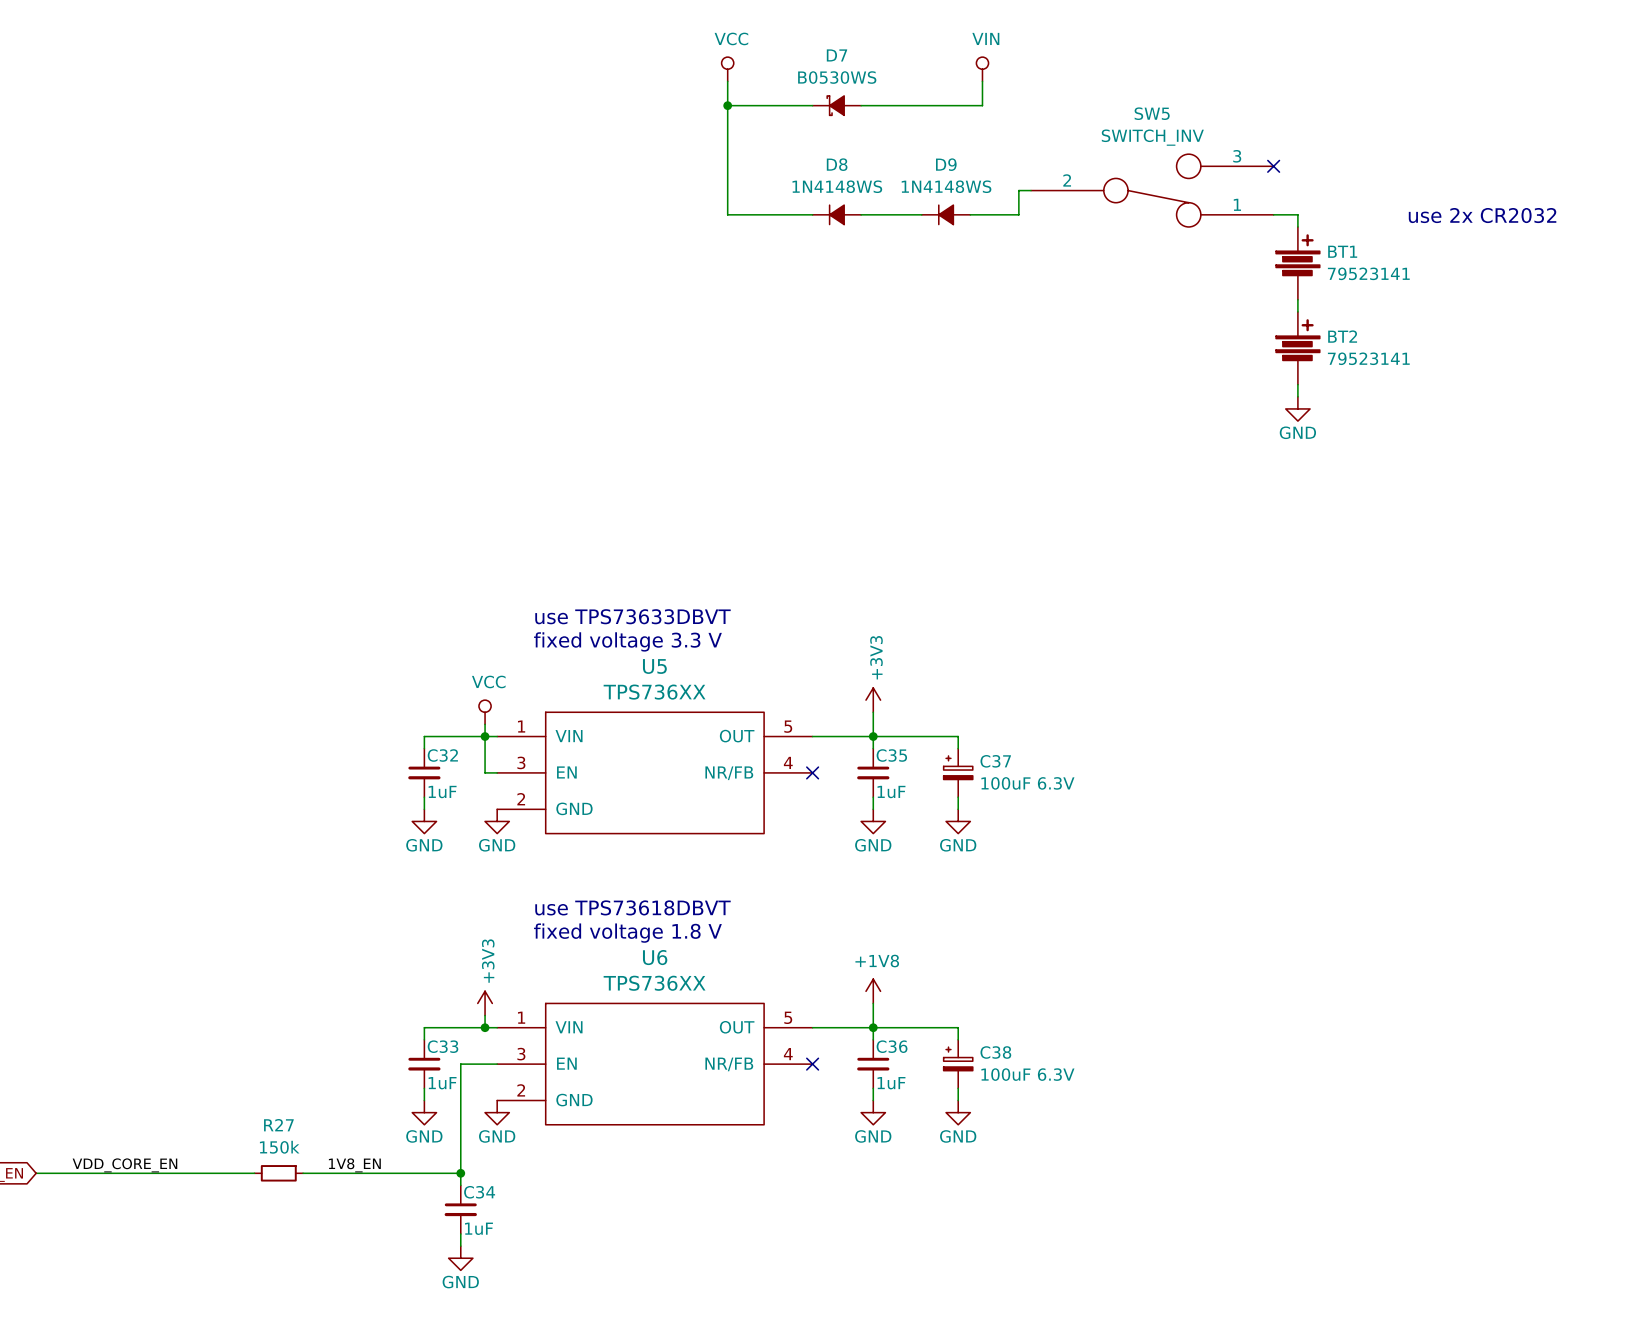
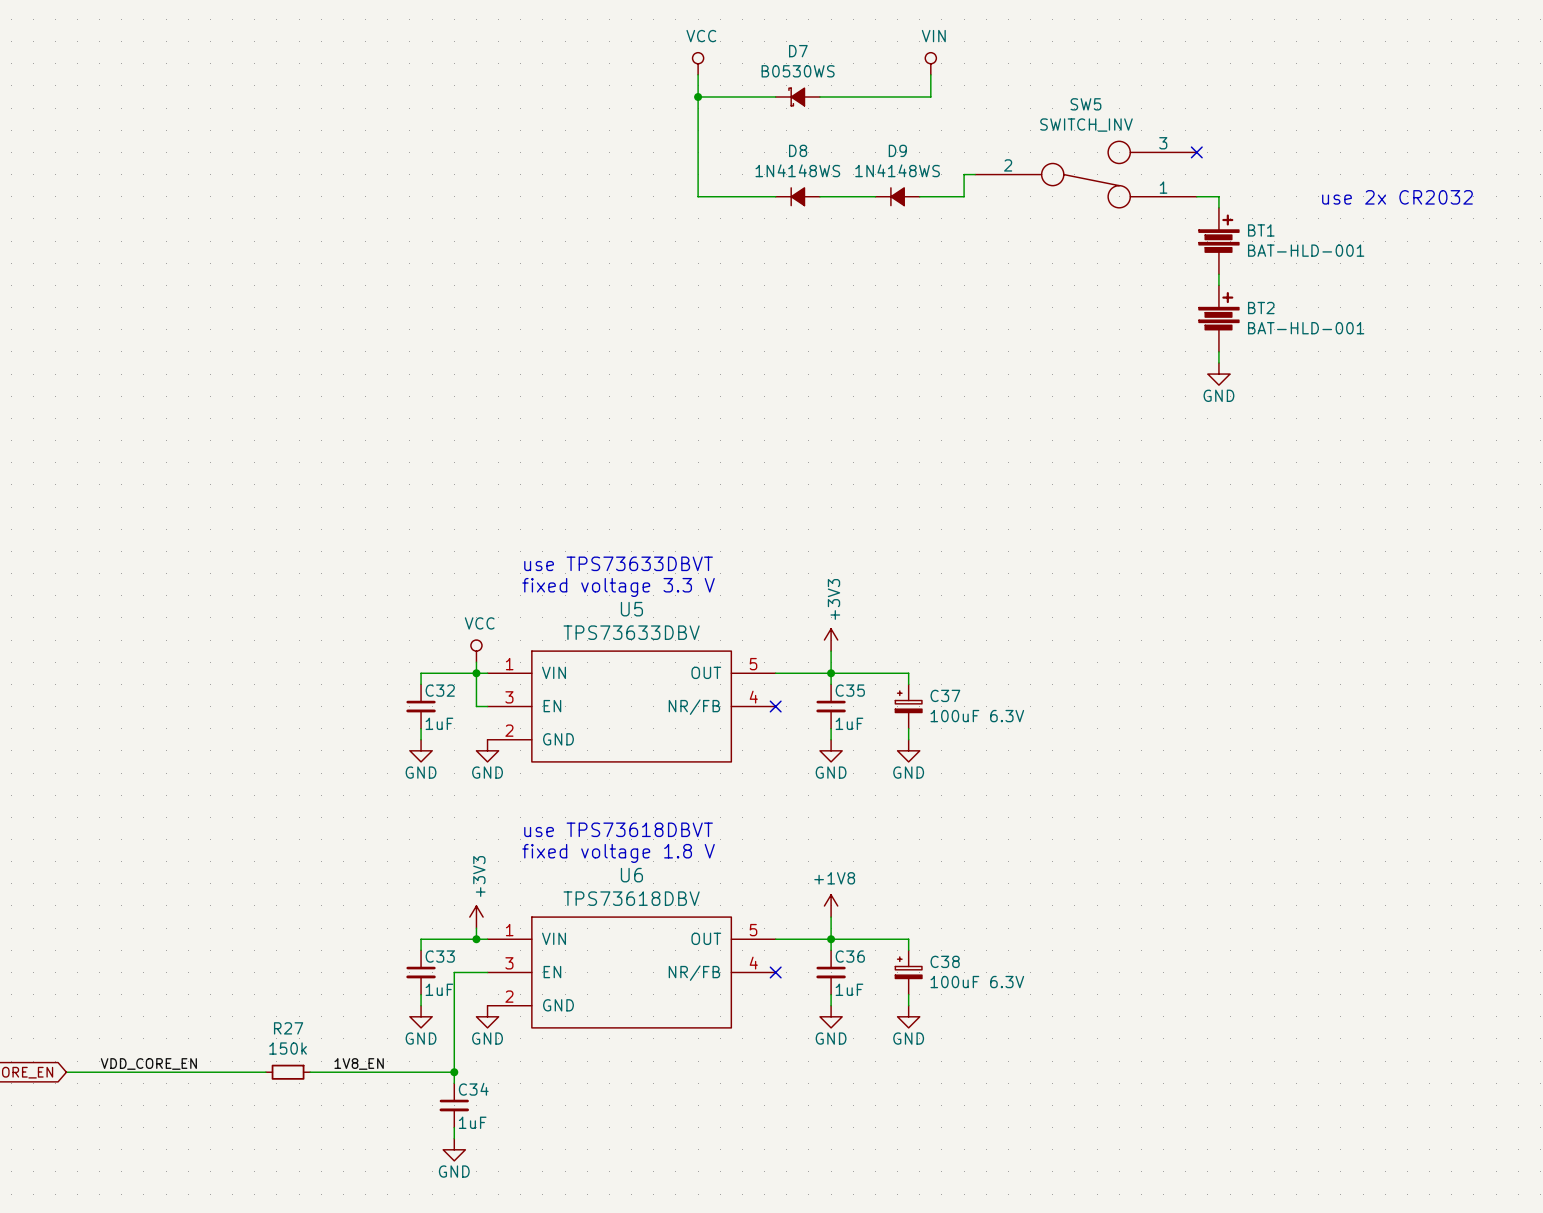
BT1 value: 79523141 (1368, 273) -> BAT-HLD-001 (1306, 250)
BT2 value: 79523141 (1368, 358) -> BAT-HLD-001 (1306, 328)
U5 value: TPS736XX (654, 692) -> TPS73633DBV (631, 632)
U6 value: TPS736XX (654, 983) -> TPS73618DBV (631, 898)

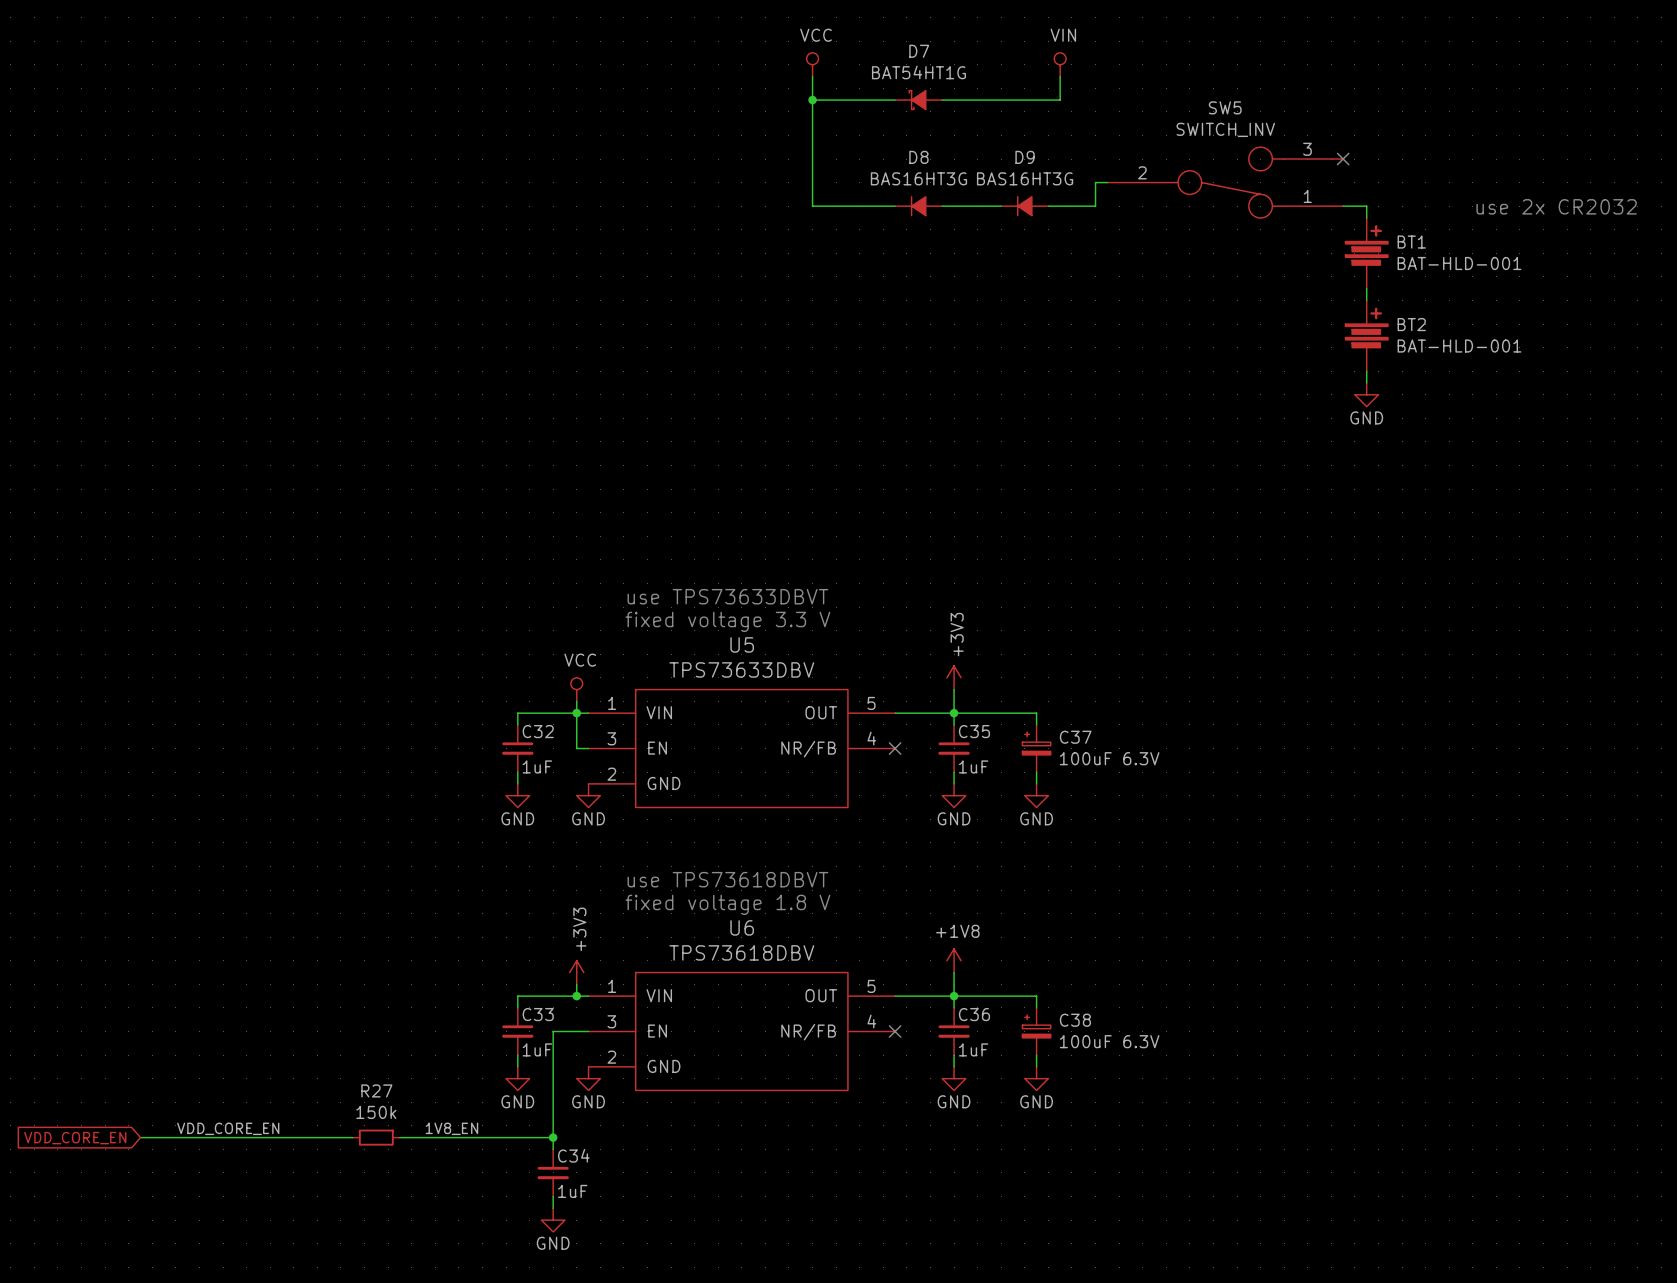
D7 value: B0530WS (798, 71) -> BAT54HT1G (918, 72)
D8 value: 1N4148WS (797, 170) -> BAS16HT3G (918, 178)
D9 value: 1N4148WS (897, 170) -> BAS16HT3G (1025, 178)

